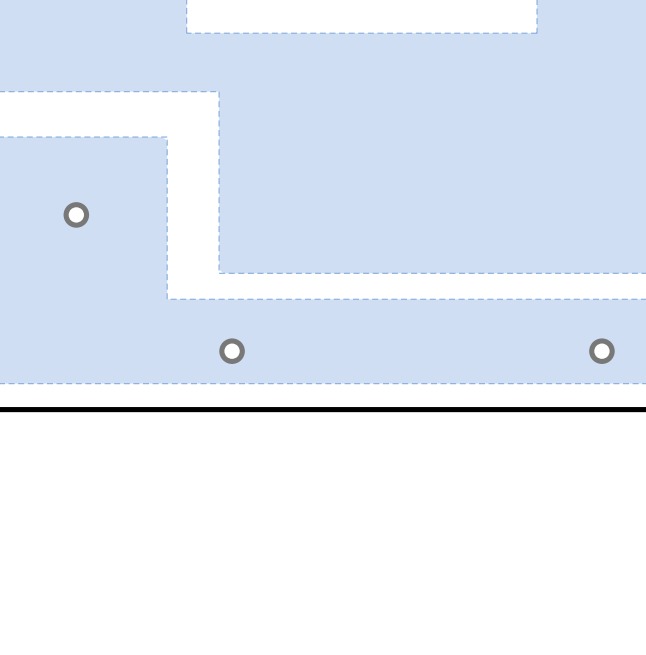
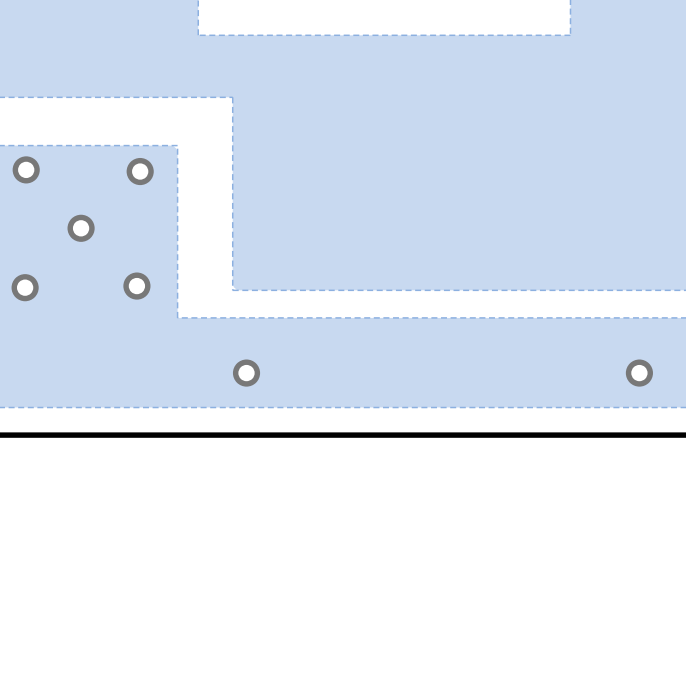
via: none -> (26, 169)
via: none -> (140, 171)
via: none -> (136, 286)
via: none -> (25, 287)

